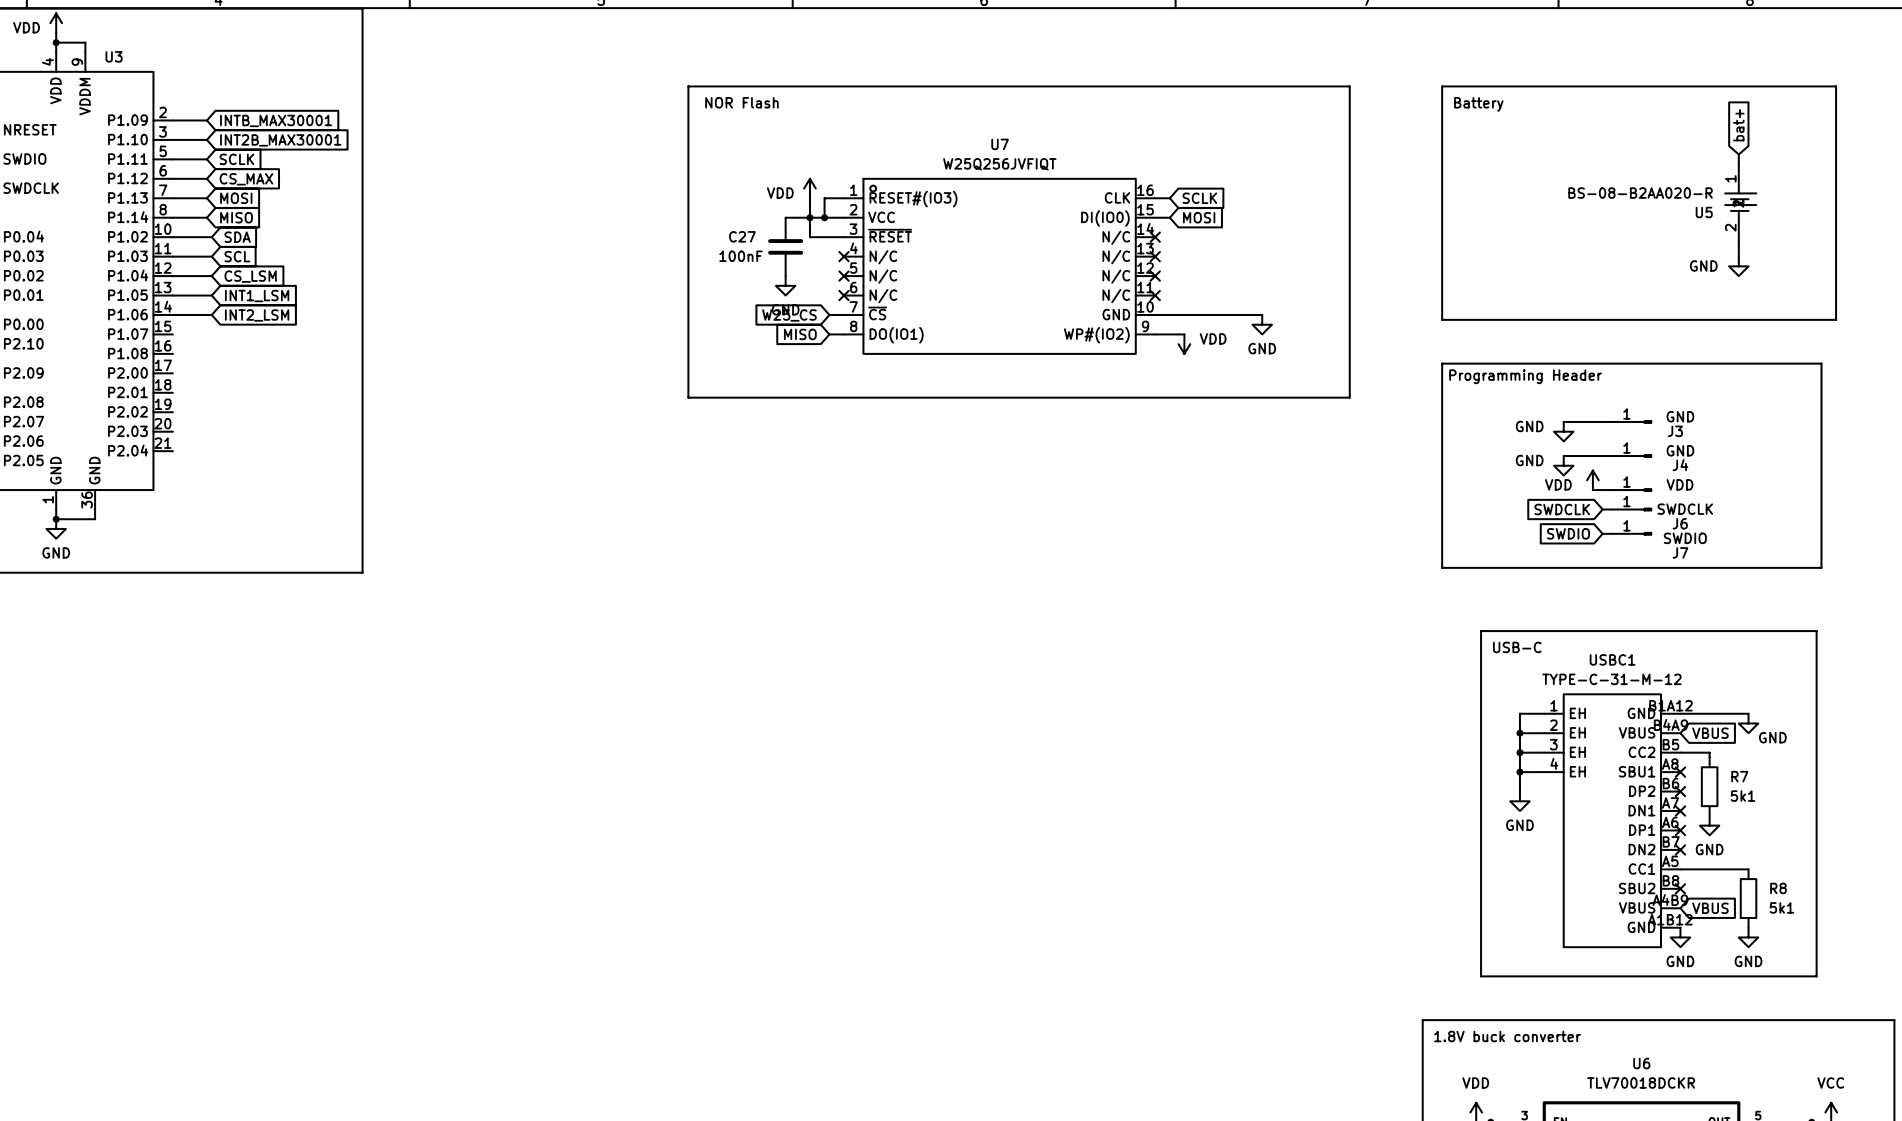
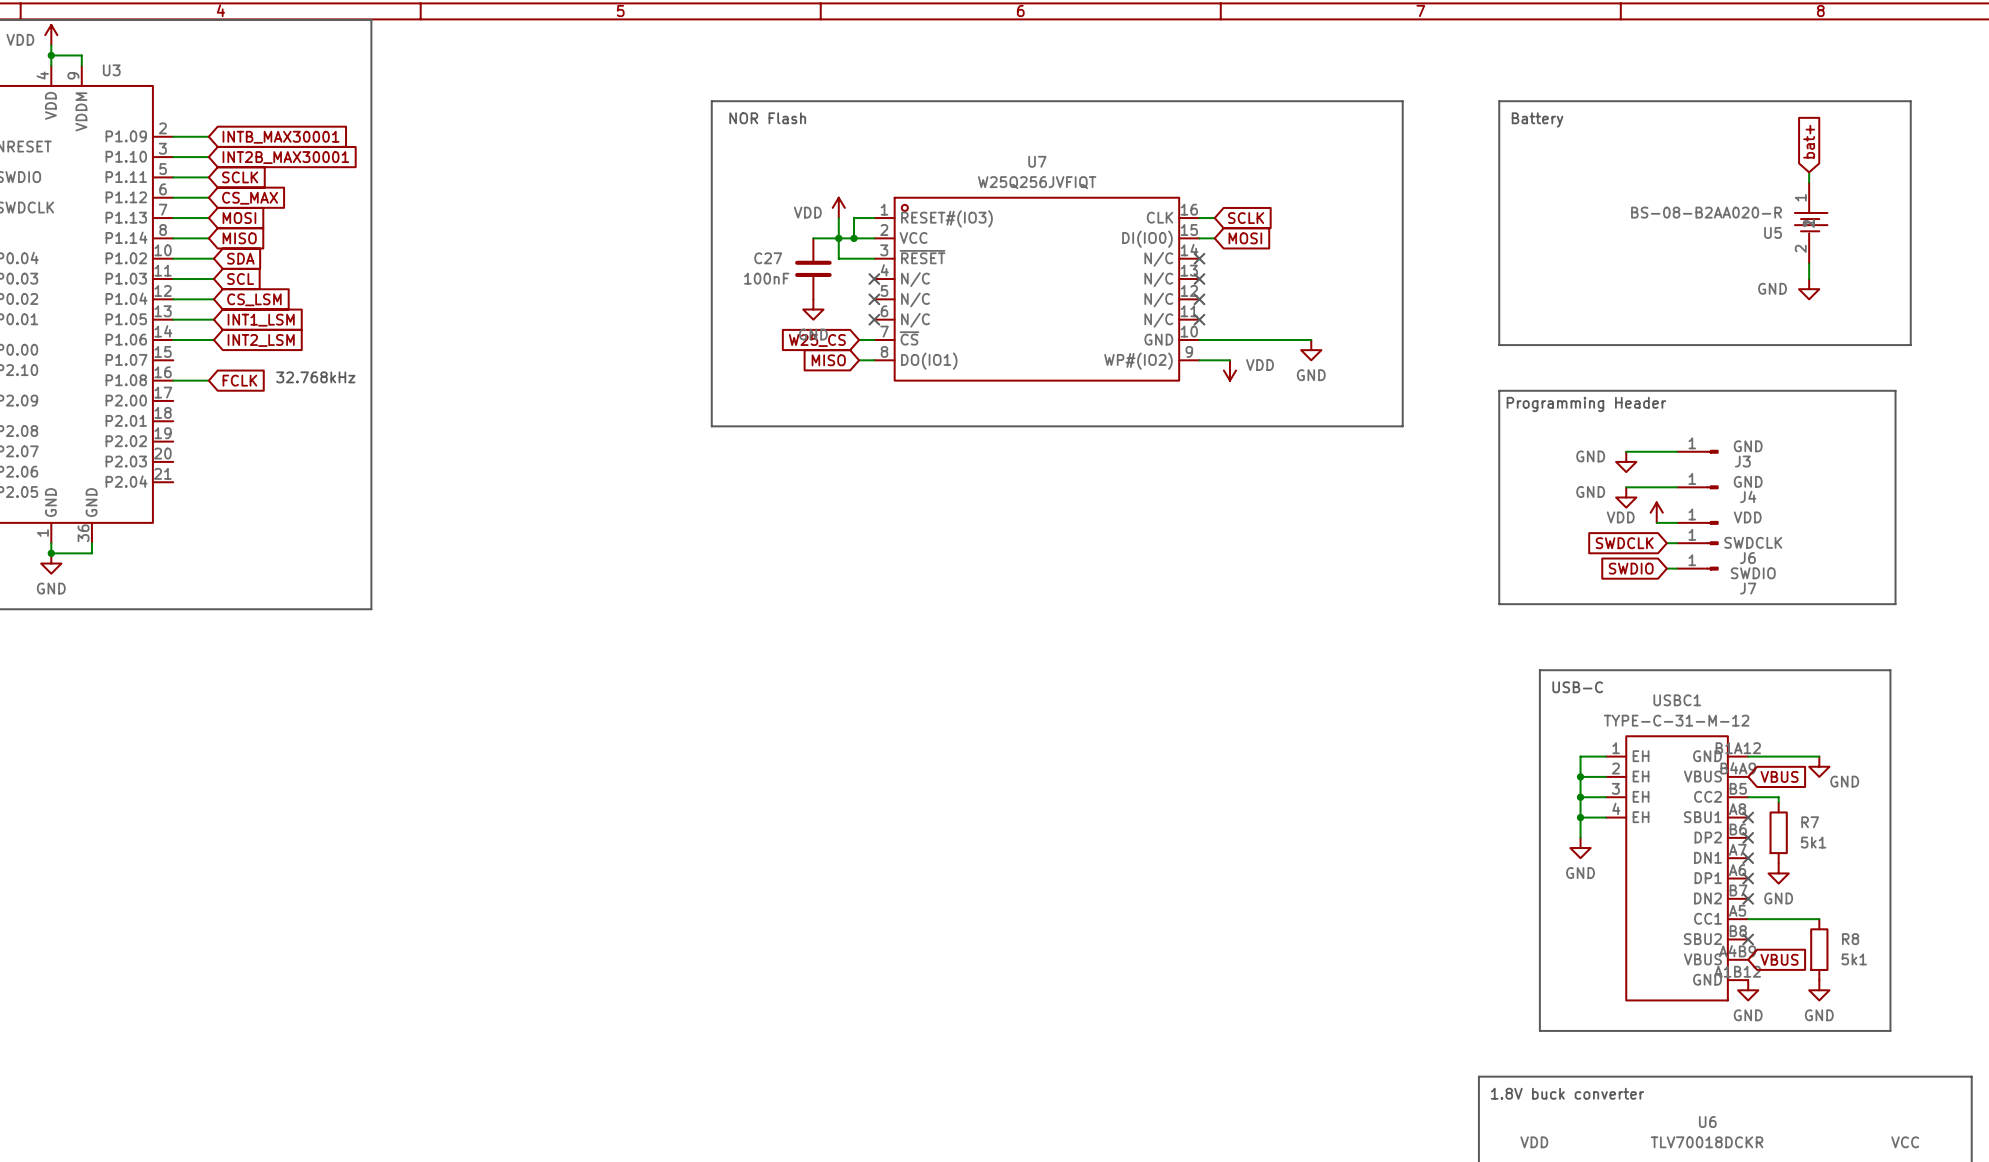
text: none -> 32.768kHz (315, 377)
wire: none -> (173, 380) (208, 380)
global label: none -> FCLK (239, 380)

